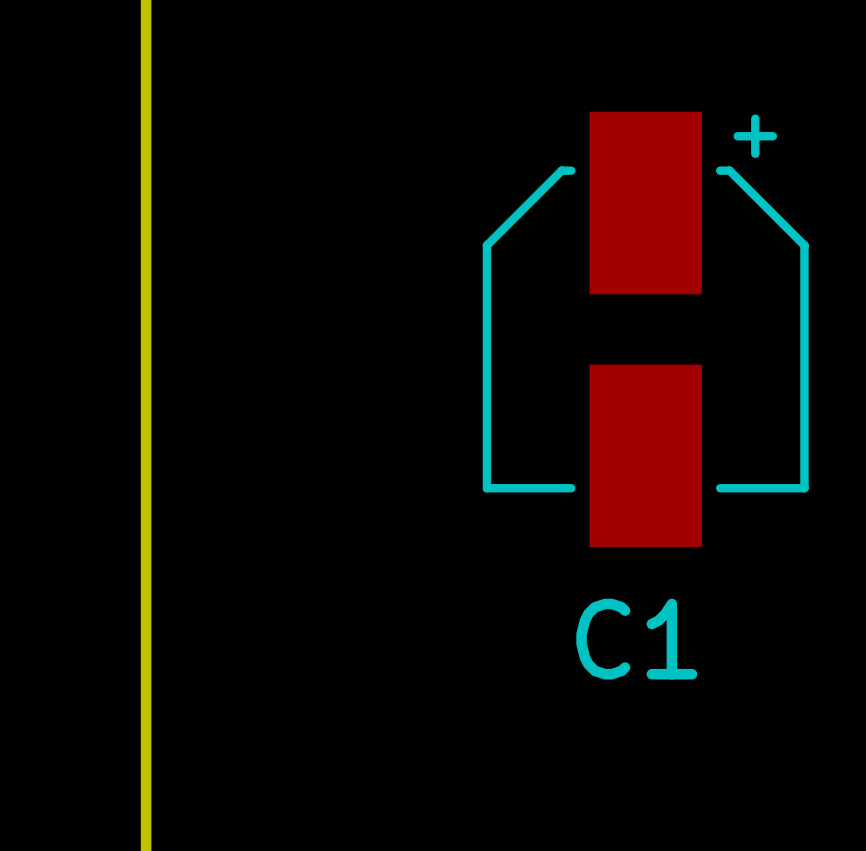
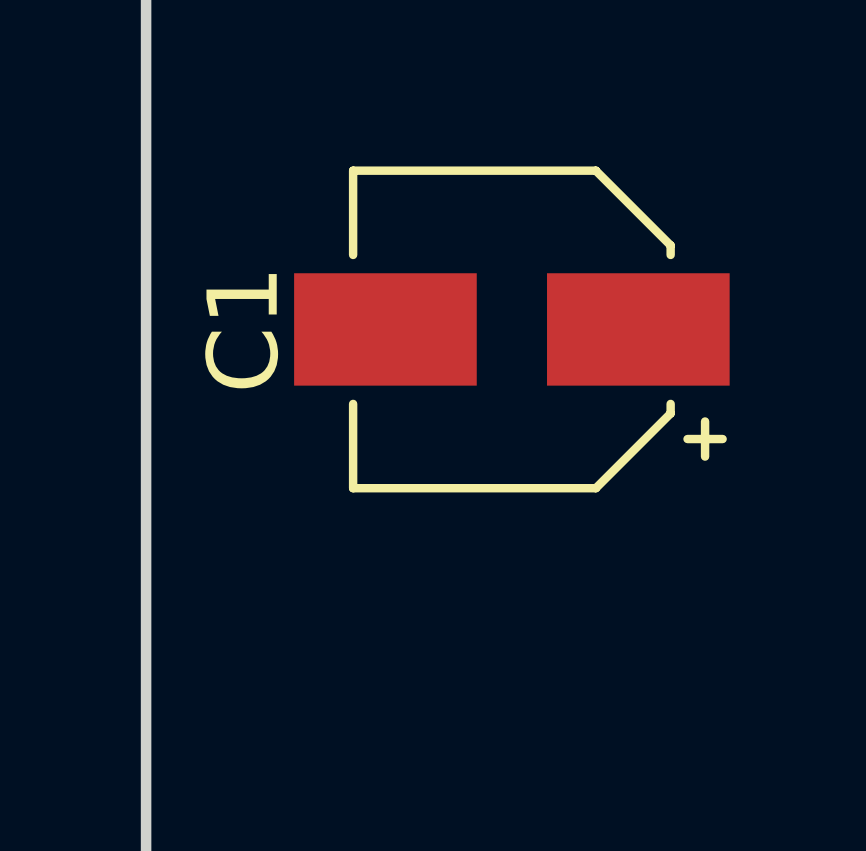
C1 rotation: 0° (645, 329) -> 90° clockwise (511, 329)

